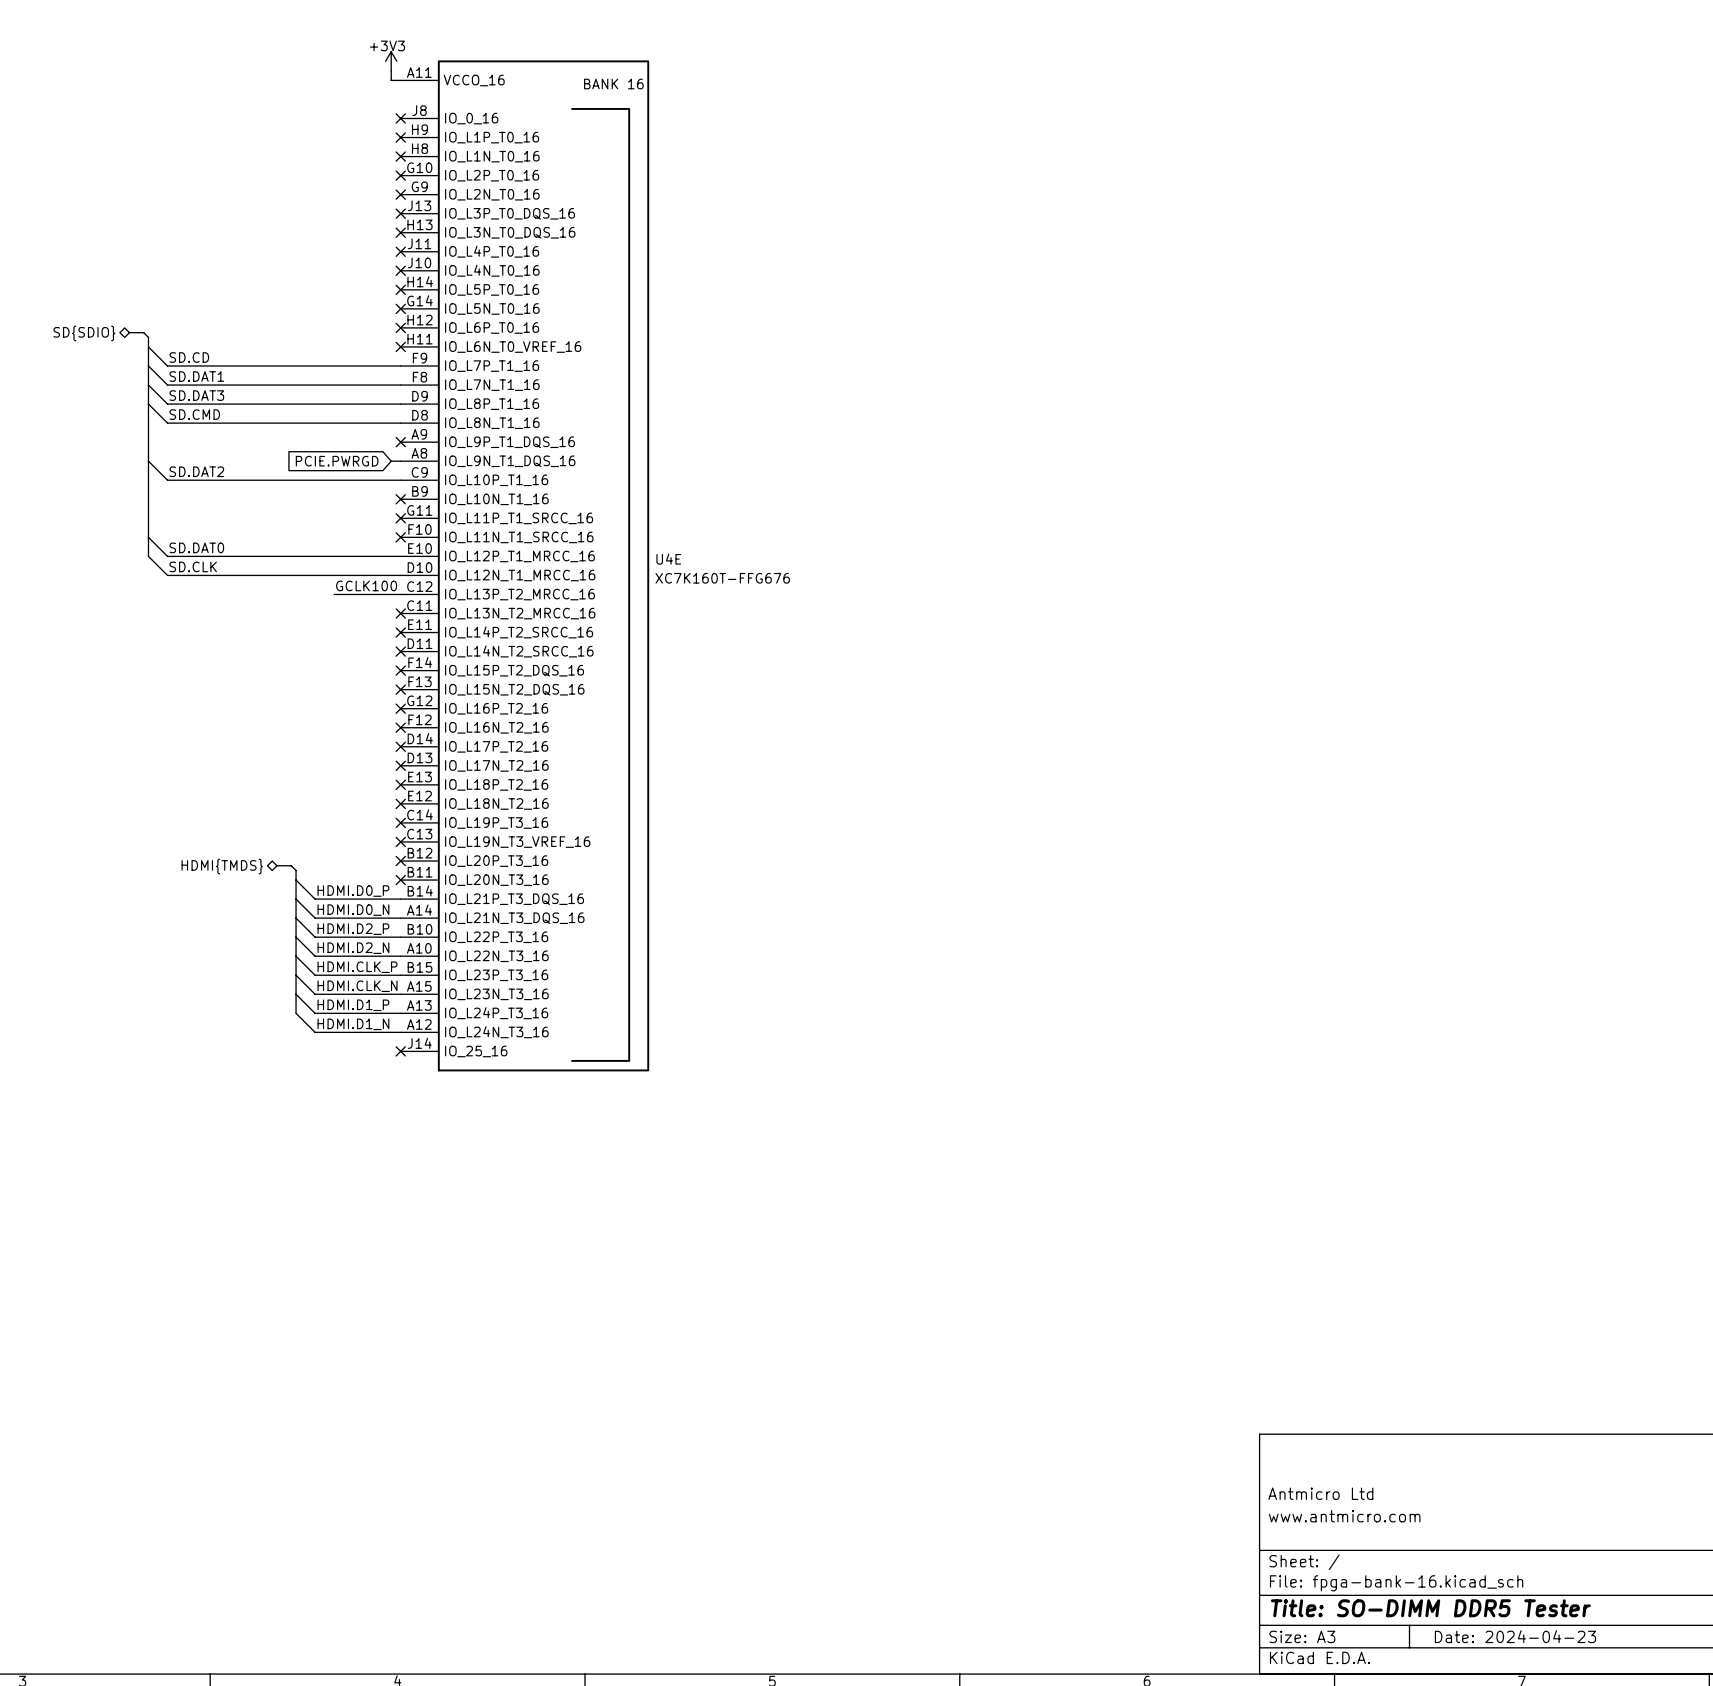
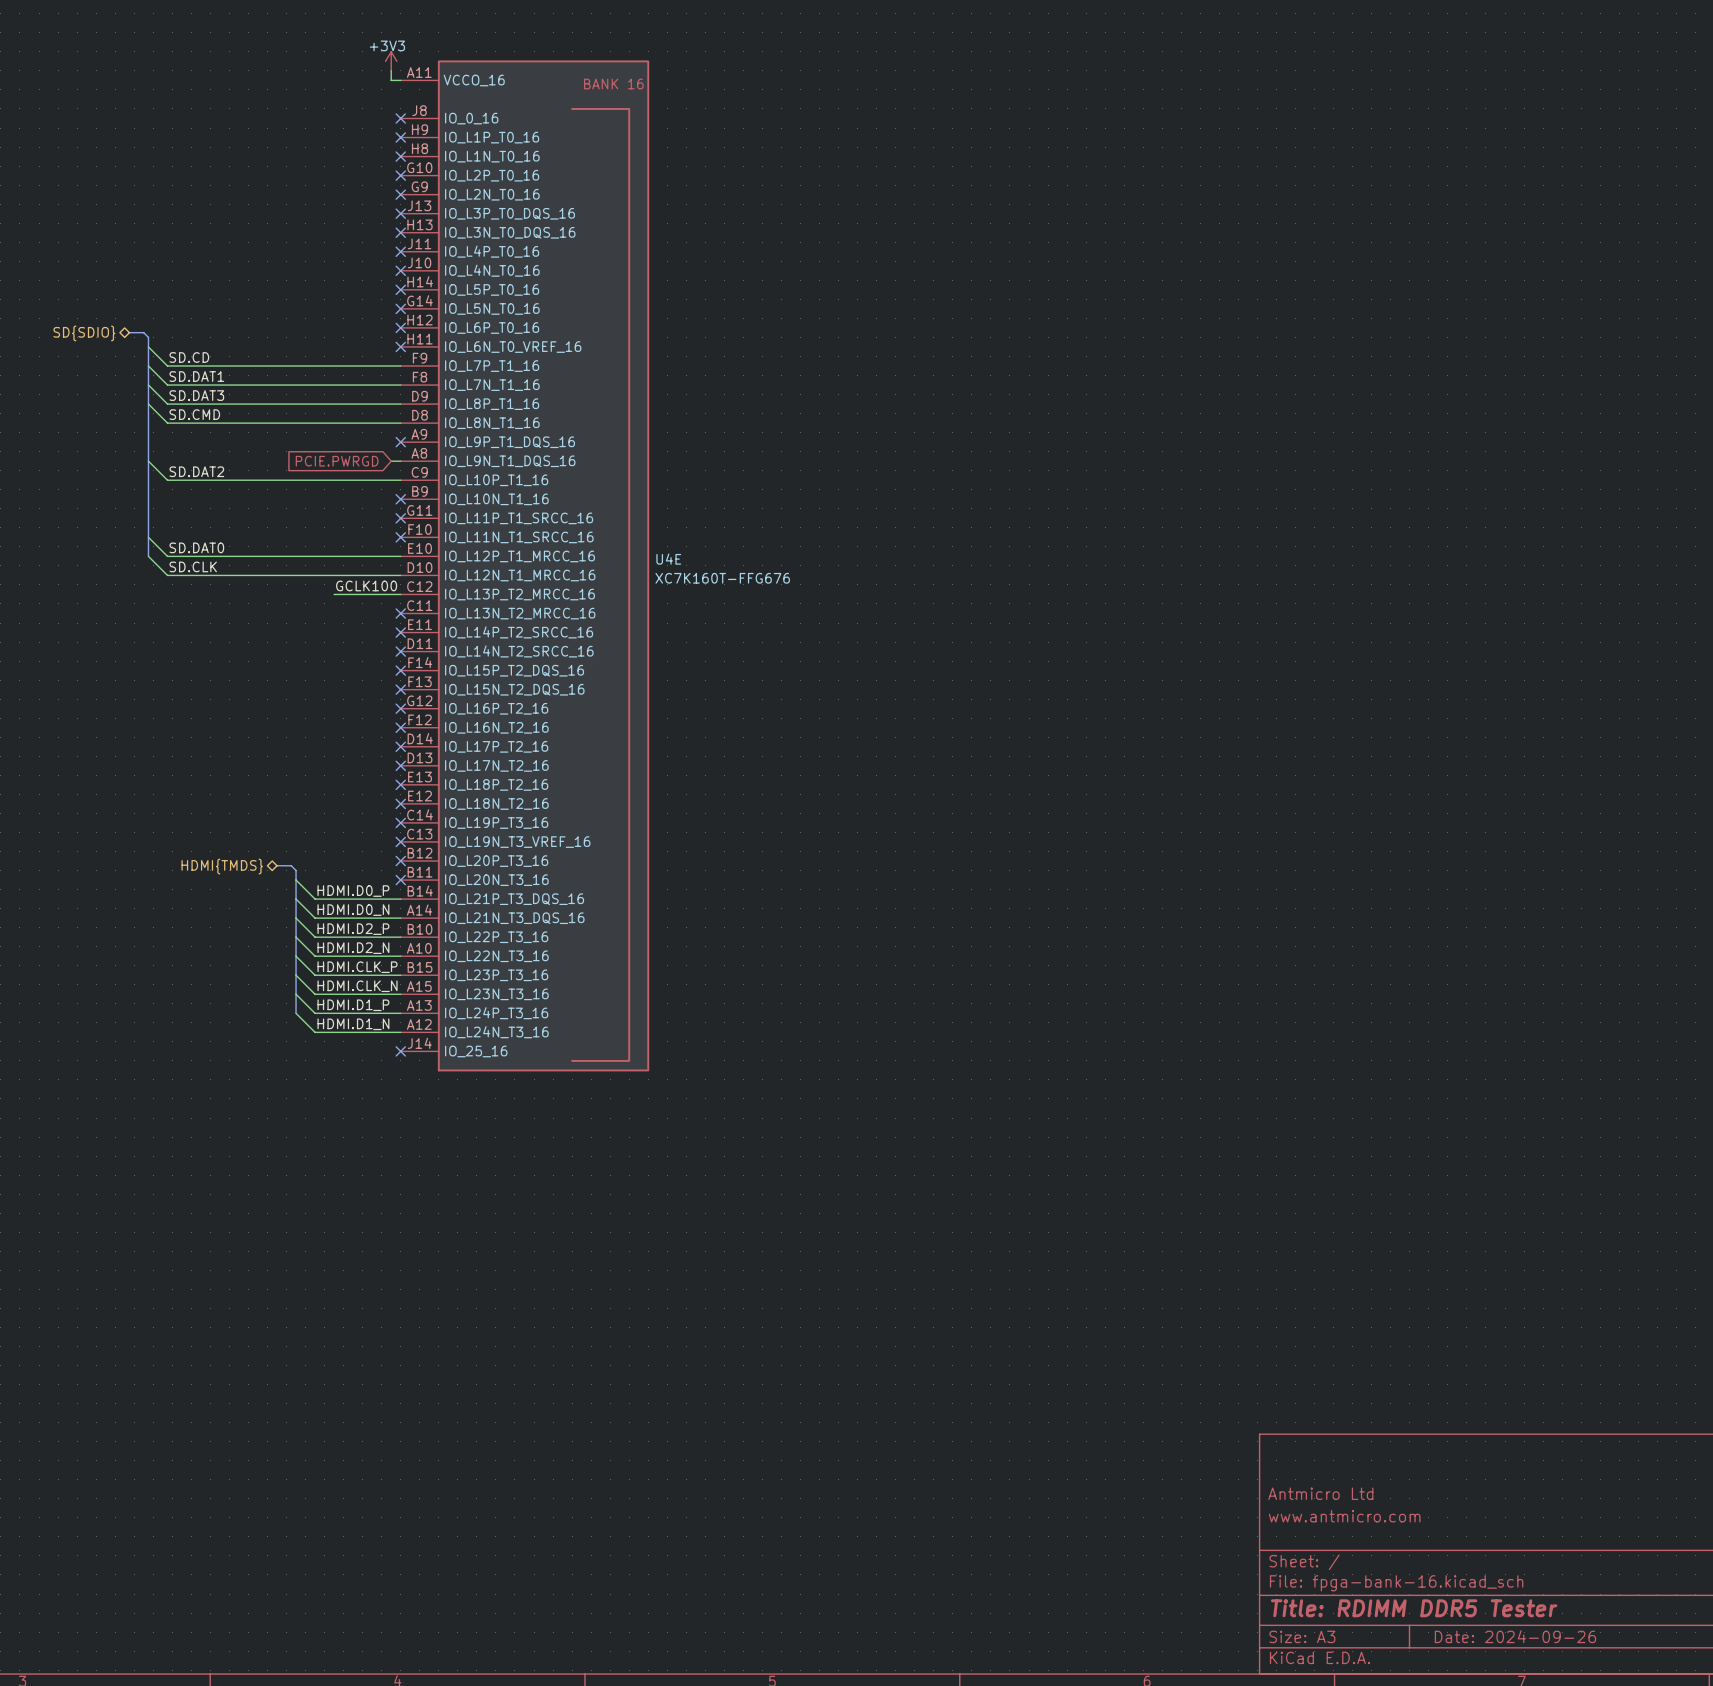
title block: Title: SO-DIMM DDR5 Tester (1430, 1608) -> Title: RDIMM DDR5 Tester (1414, 1608)
title block: Date: 2024-04-23 (1515, 1636) -> Date: 2024-09-26 (1515, 1636)

